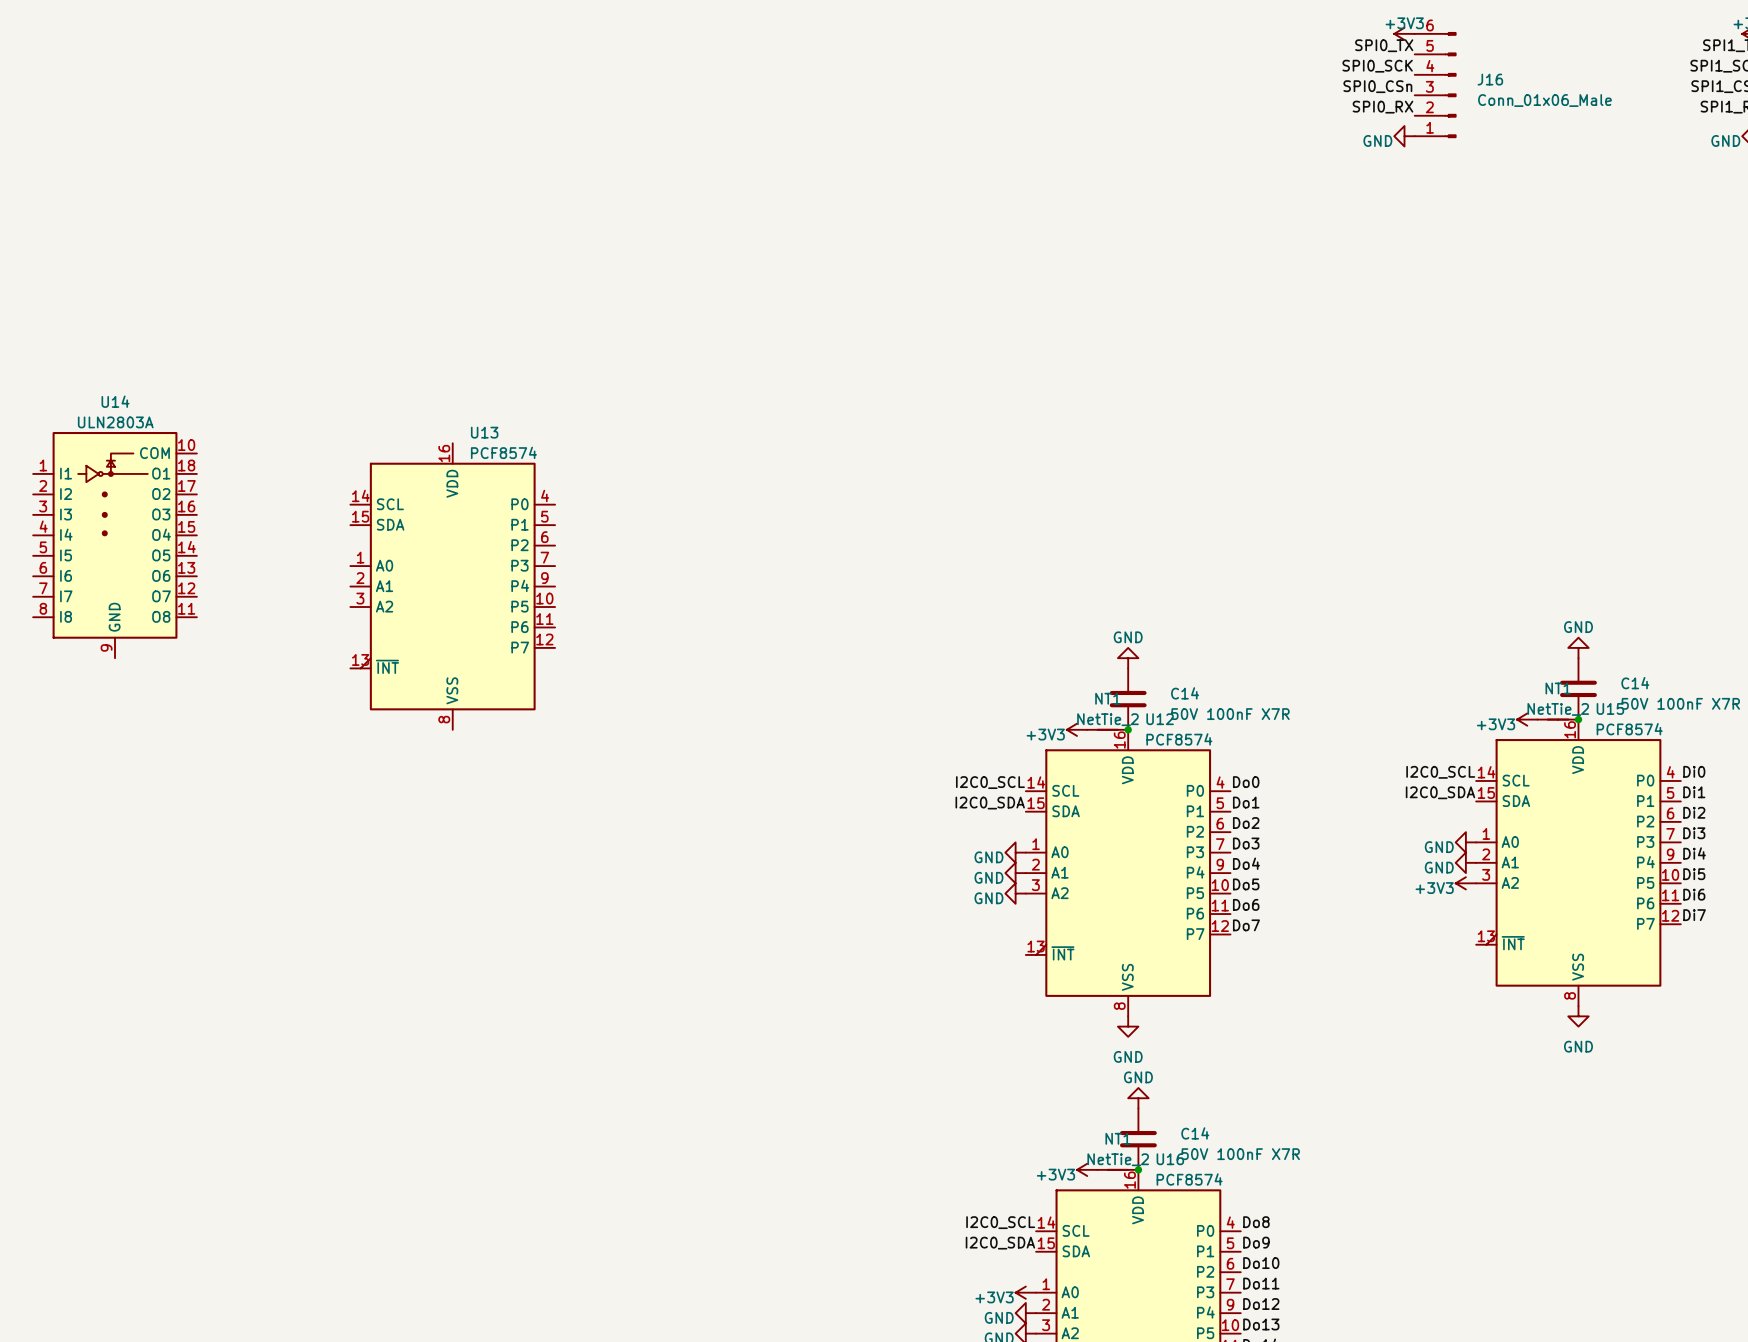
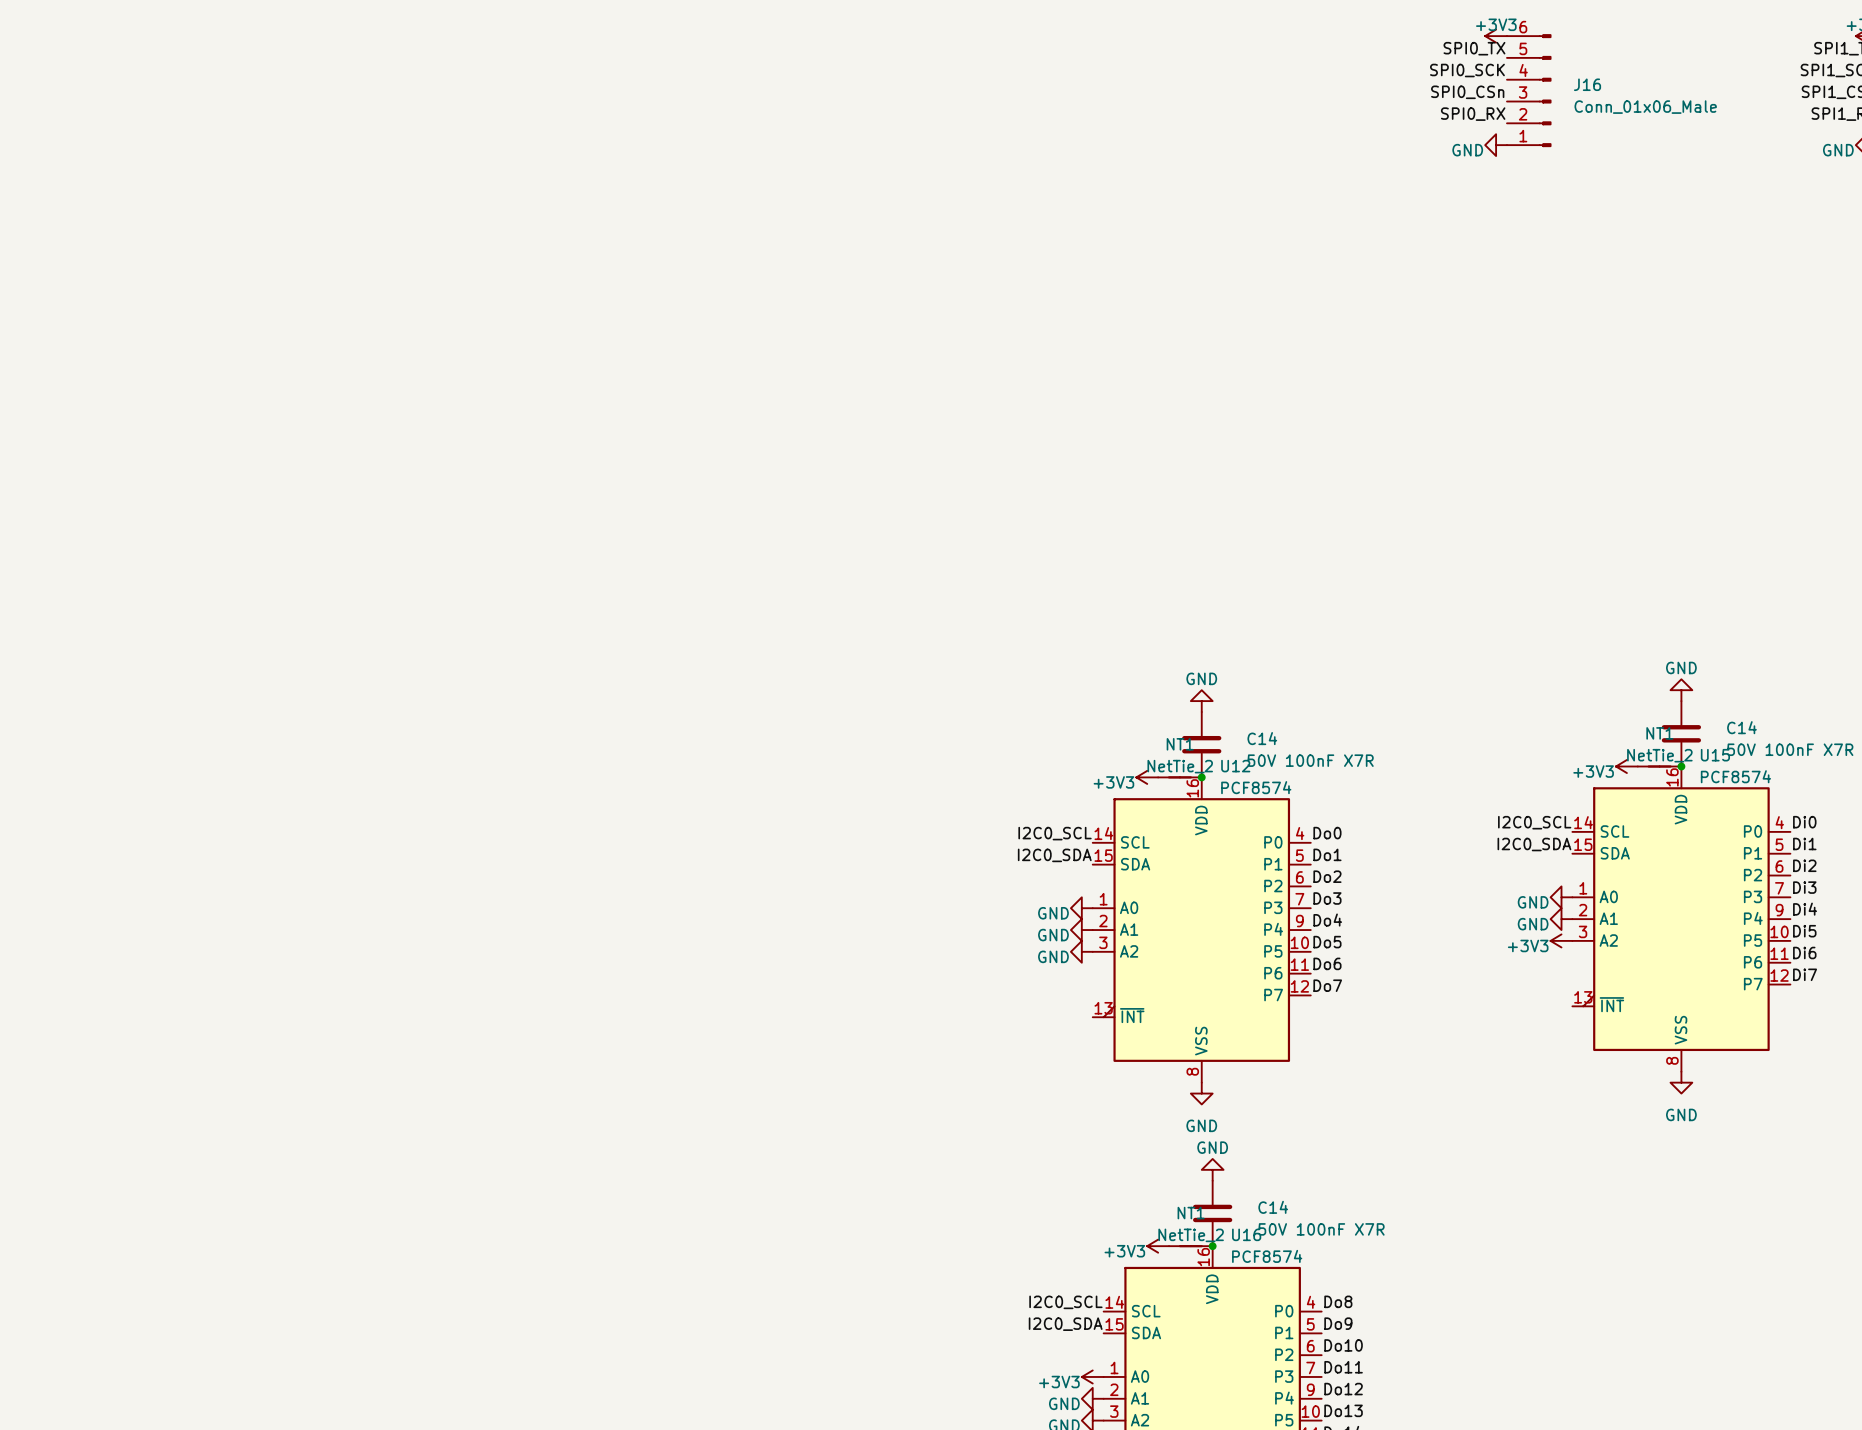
U14: ULN2803A (115, 545) -> none
U13: PCF8574 (452, 586) -> none

